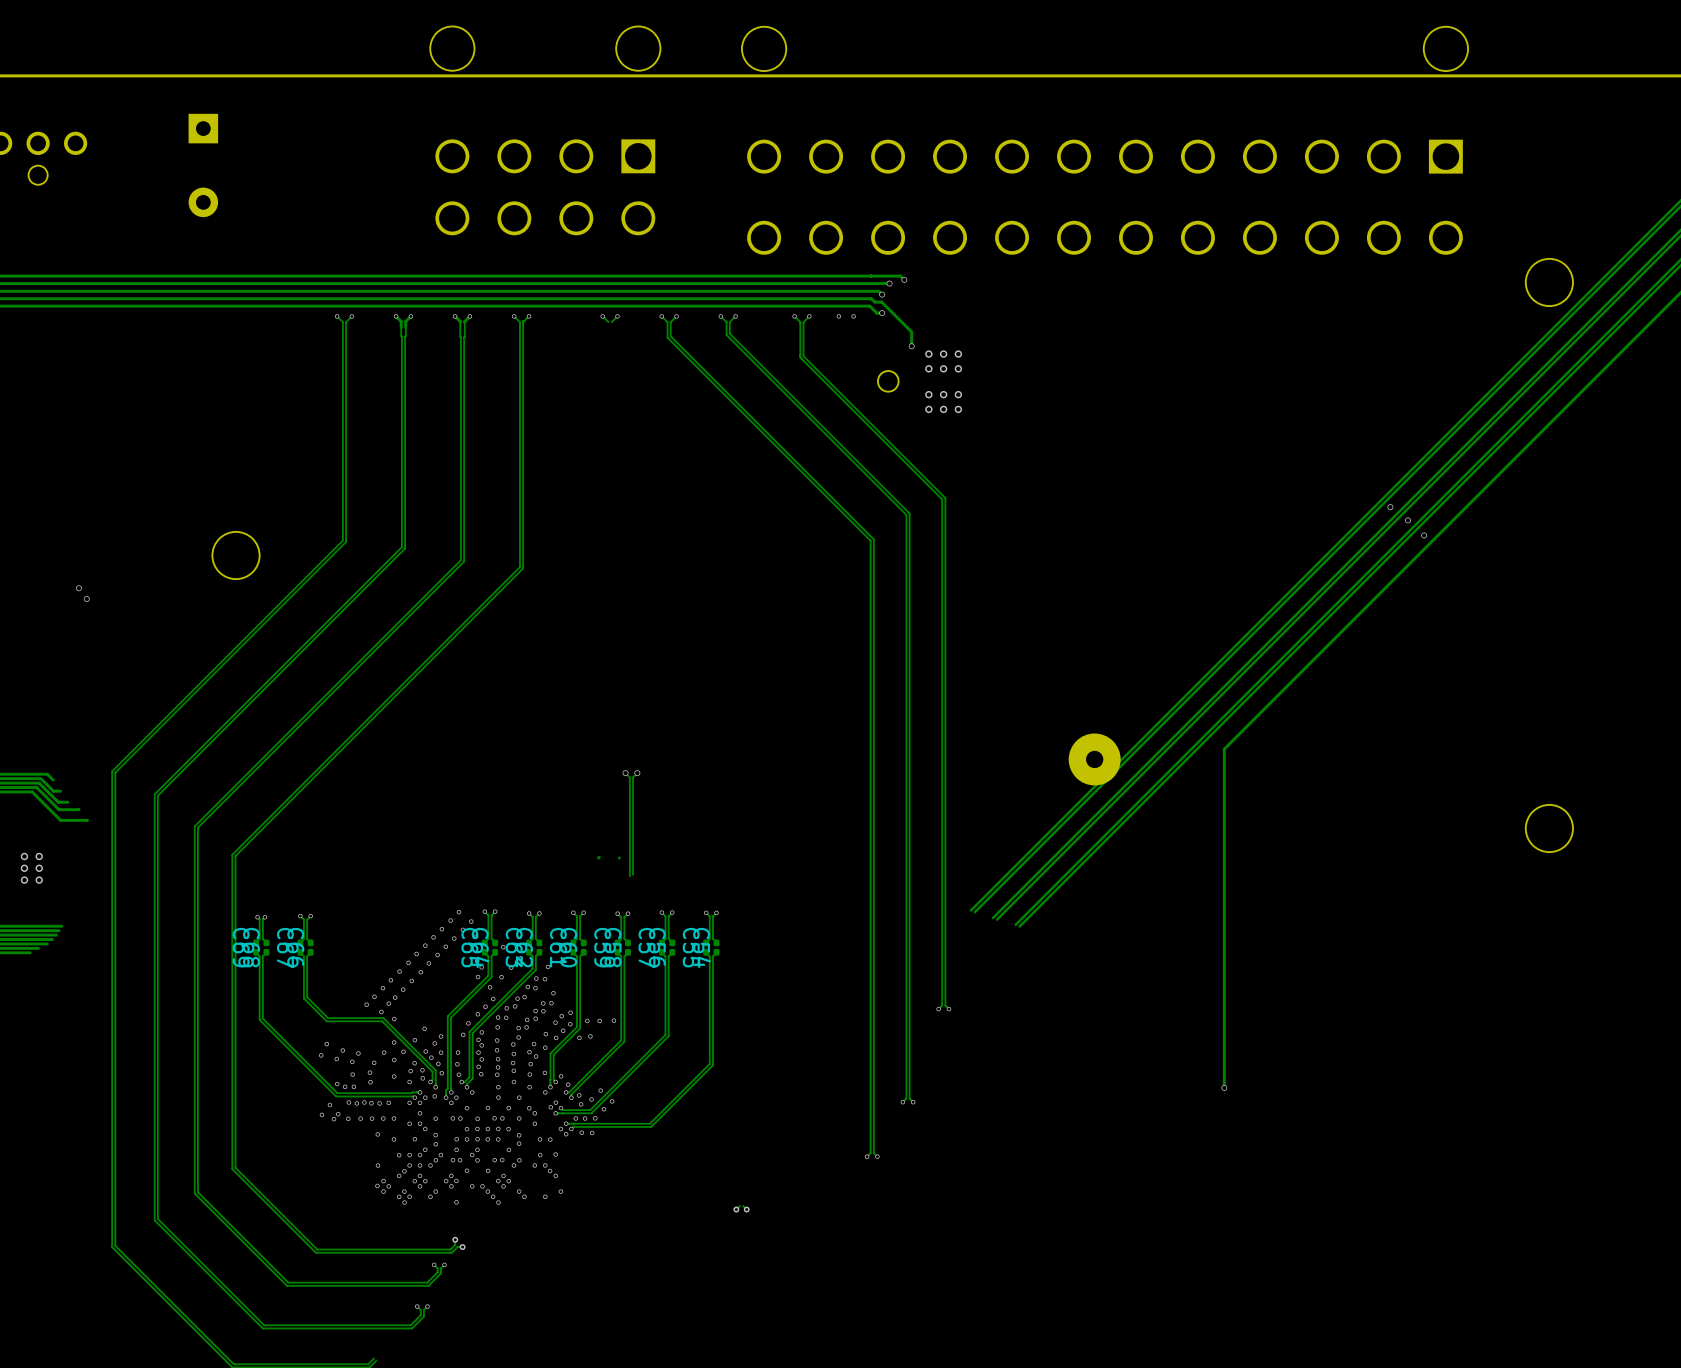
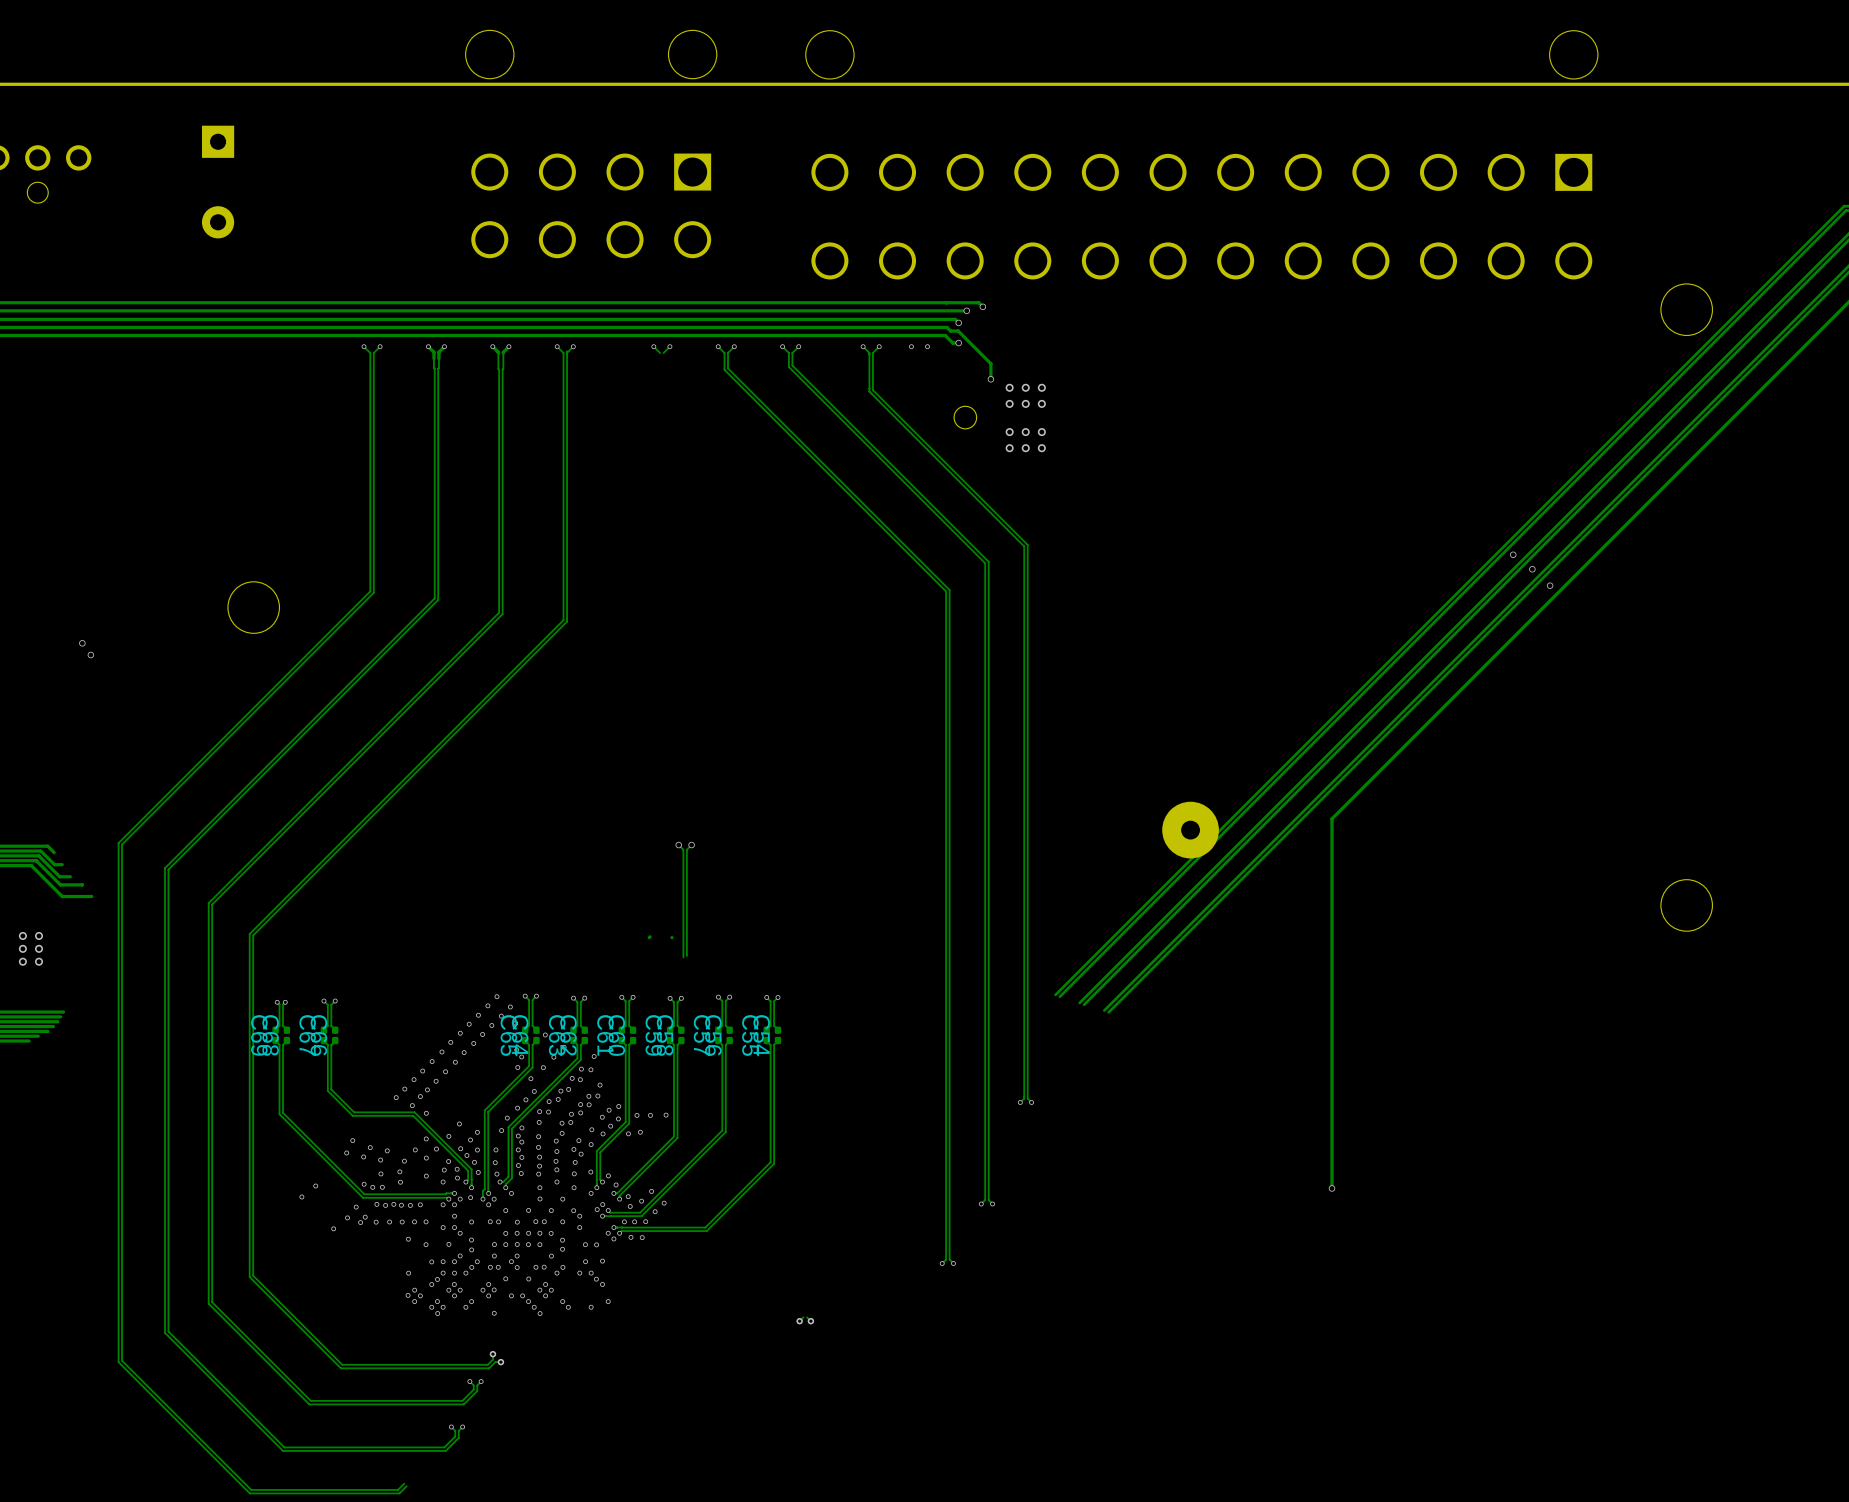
via: none -> (315, 1186)
via: none -> (301, 1196)
via: none -> (333, 1228)

